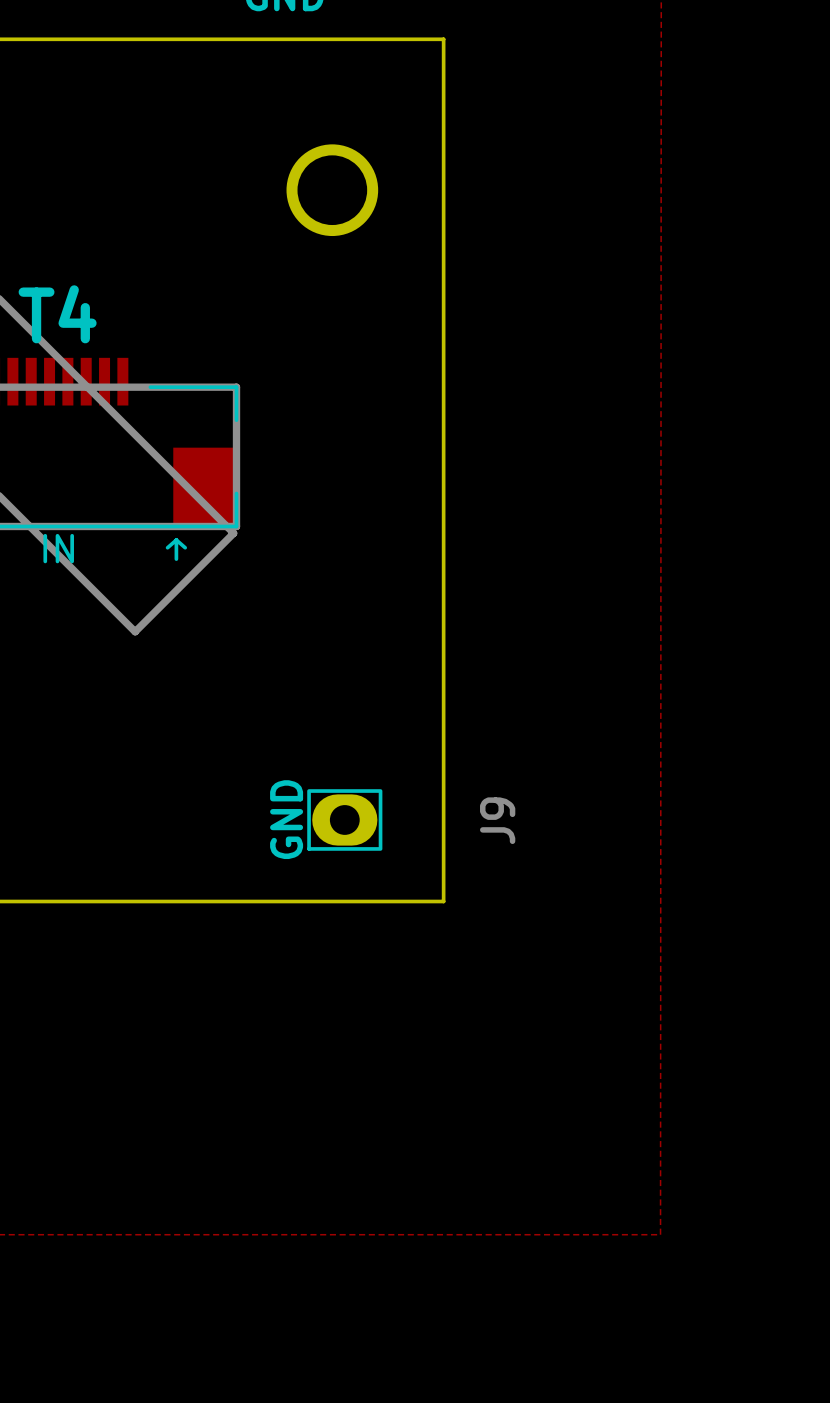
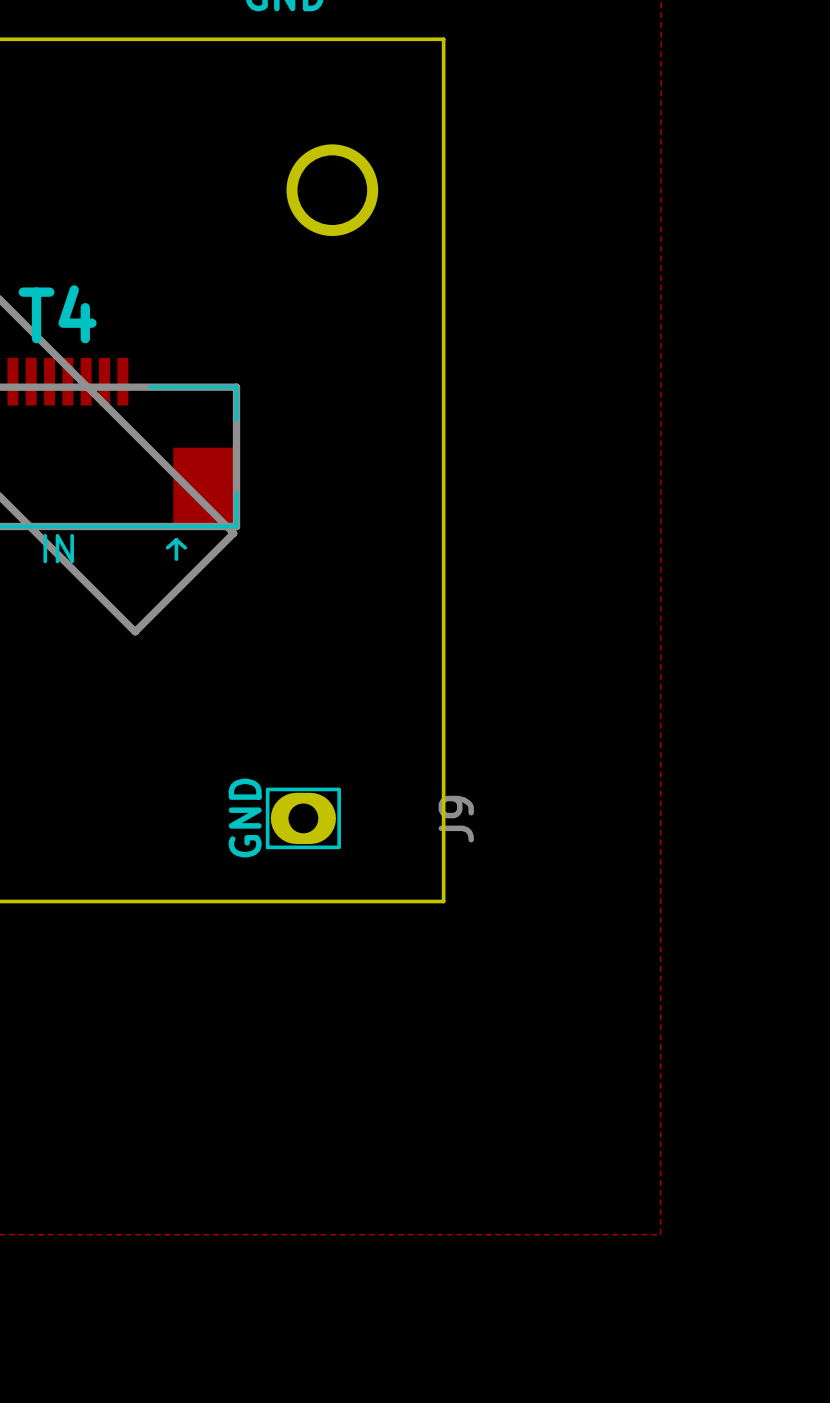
J9 position: (344, 819) -> (303, 818)

